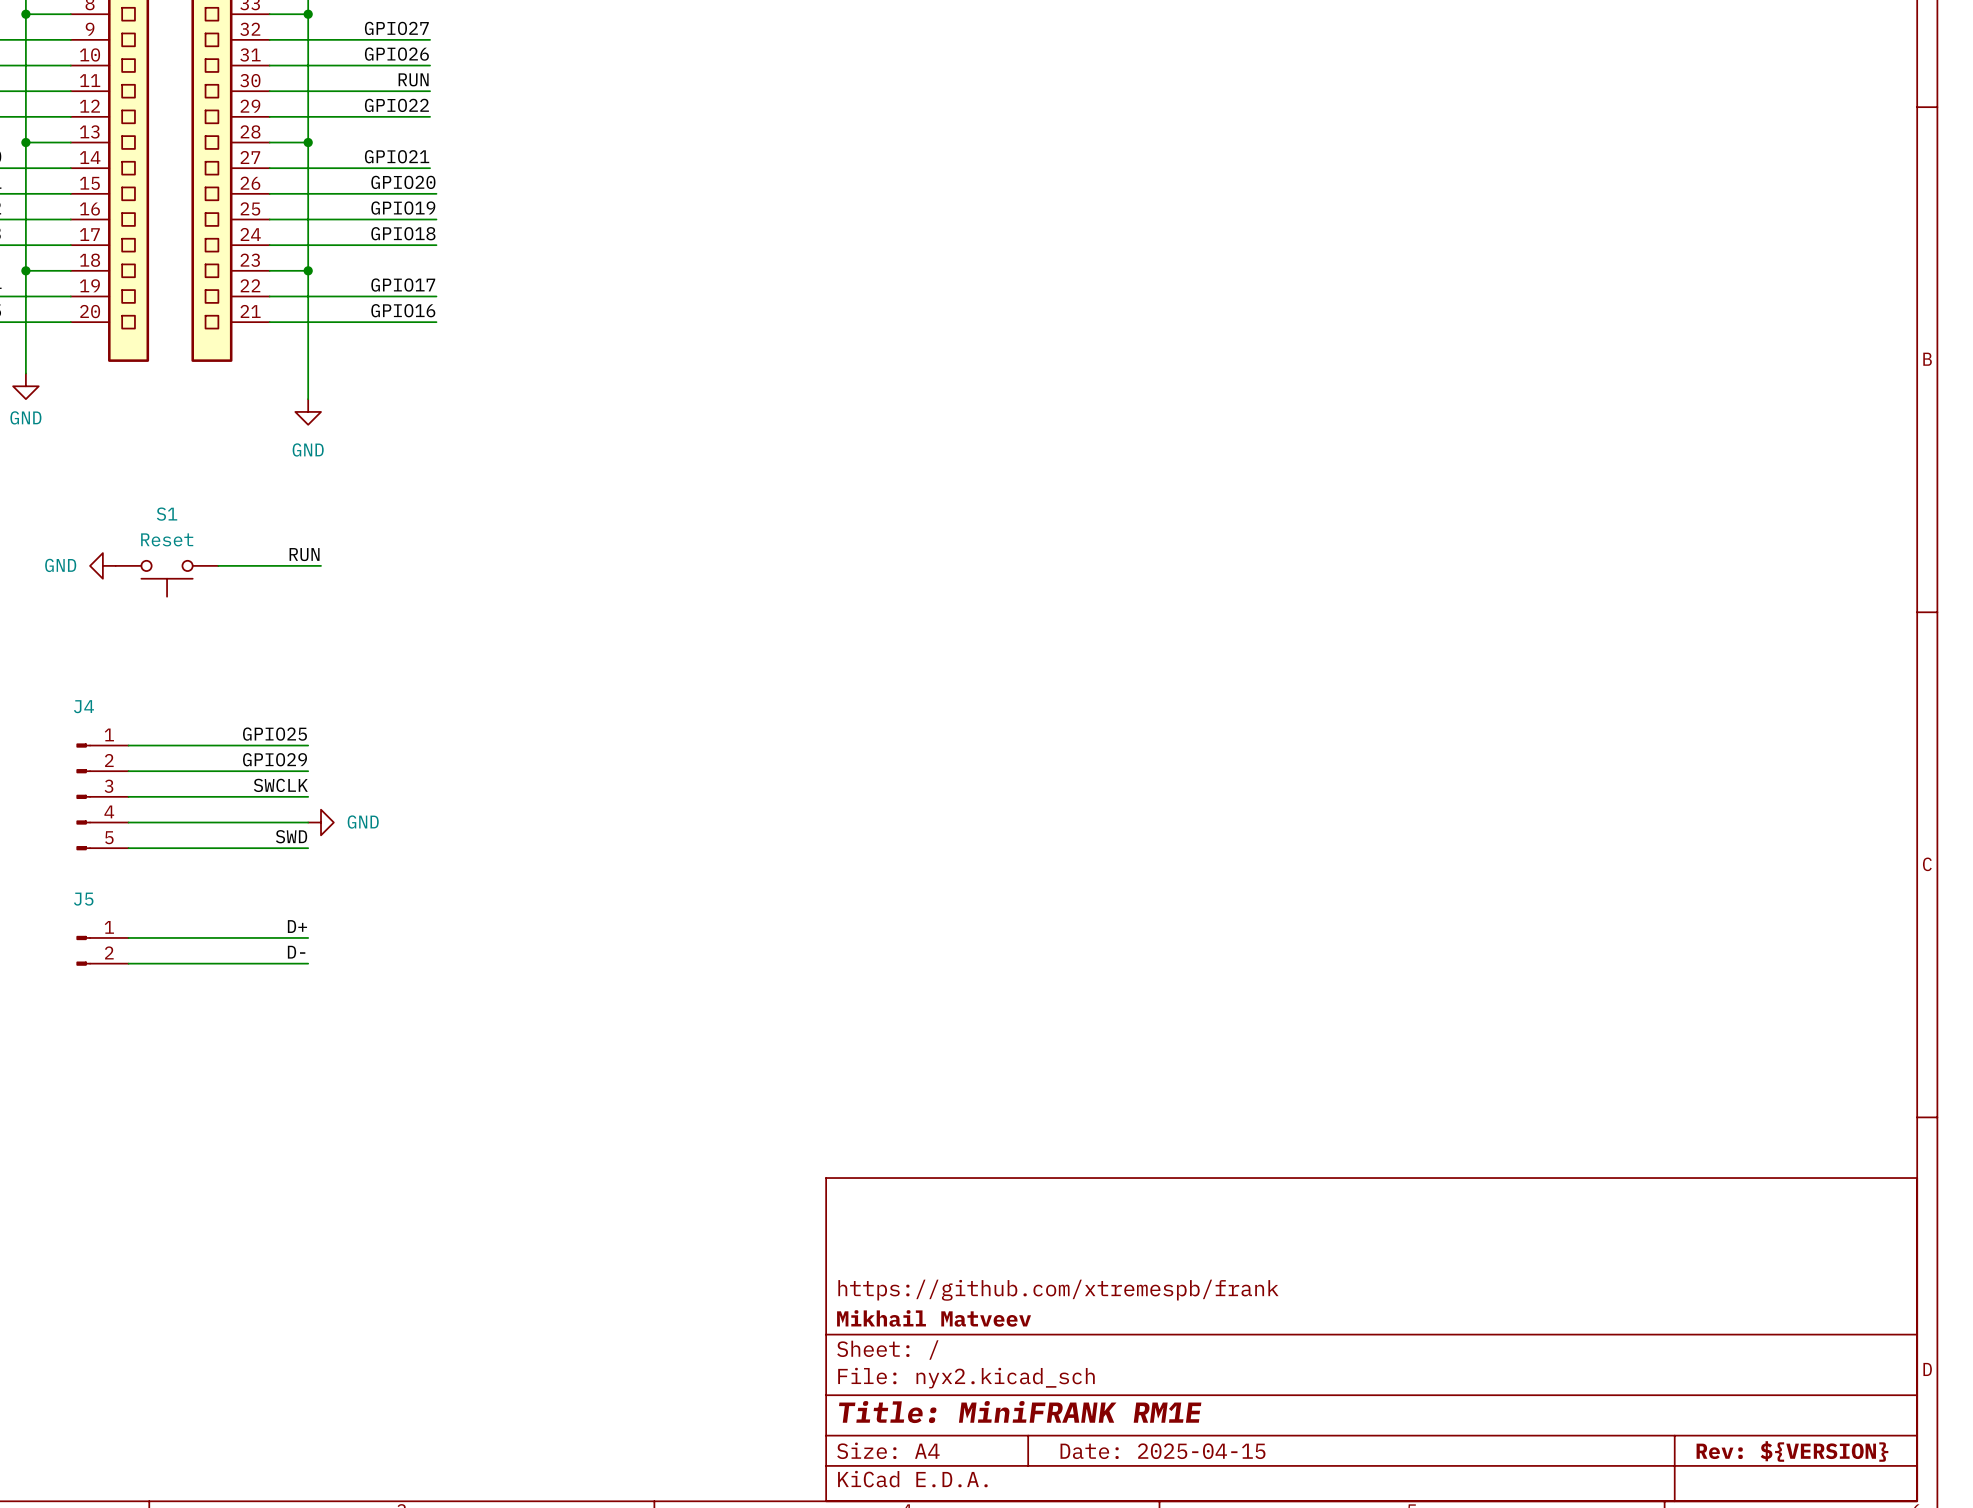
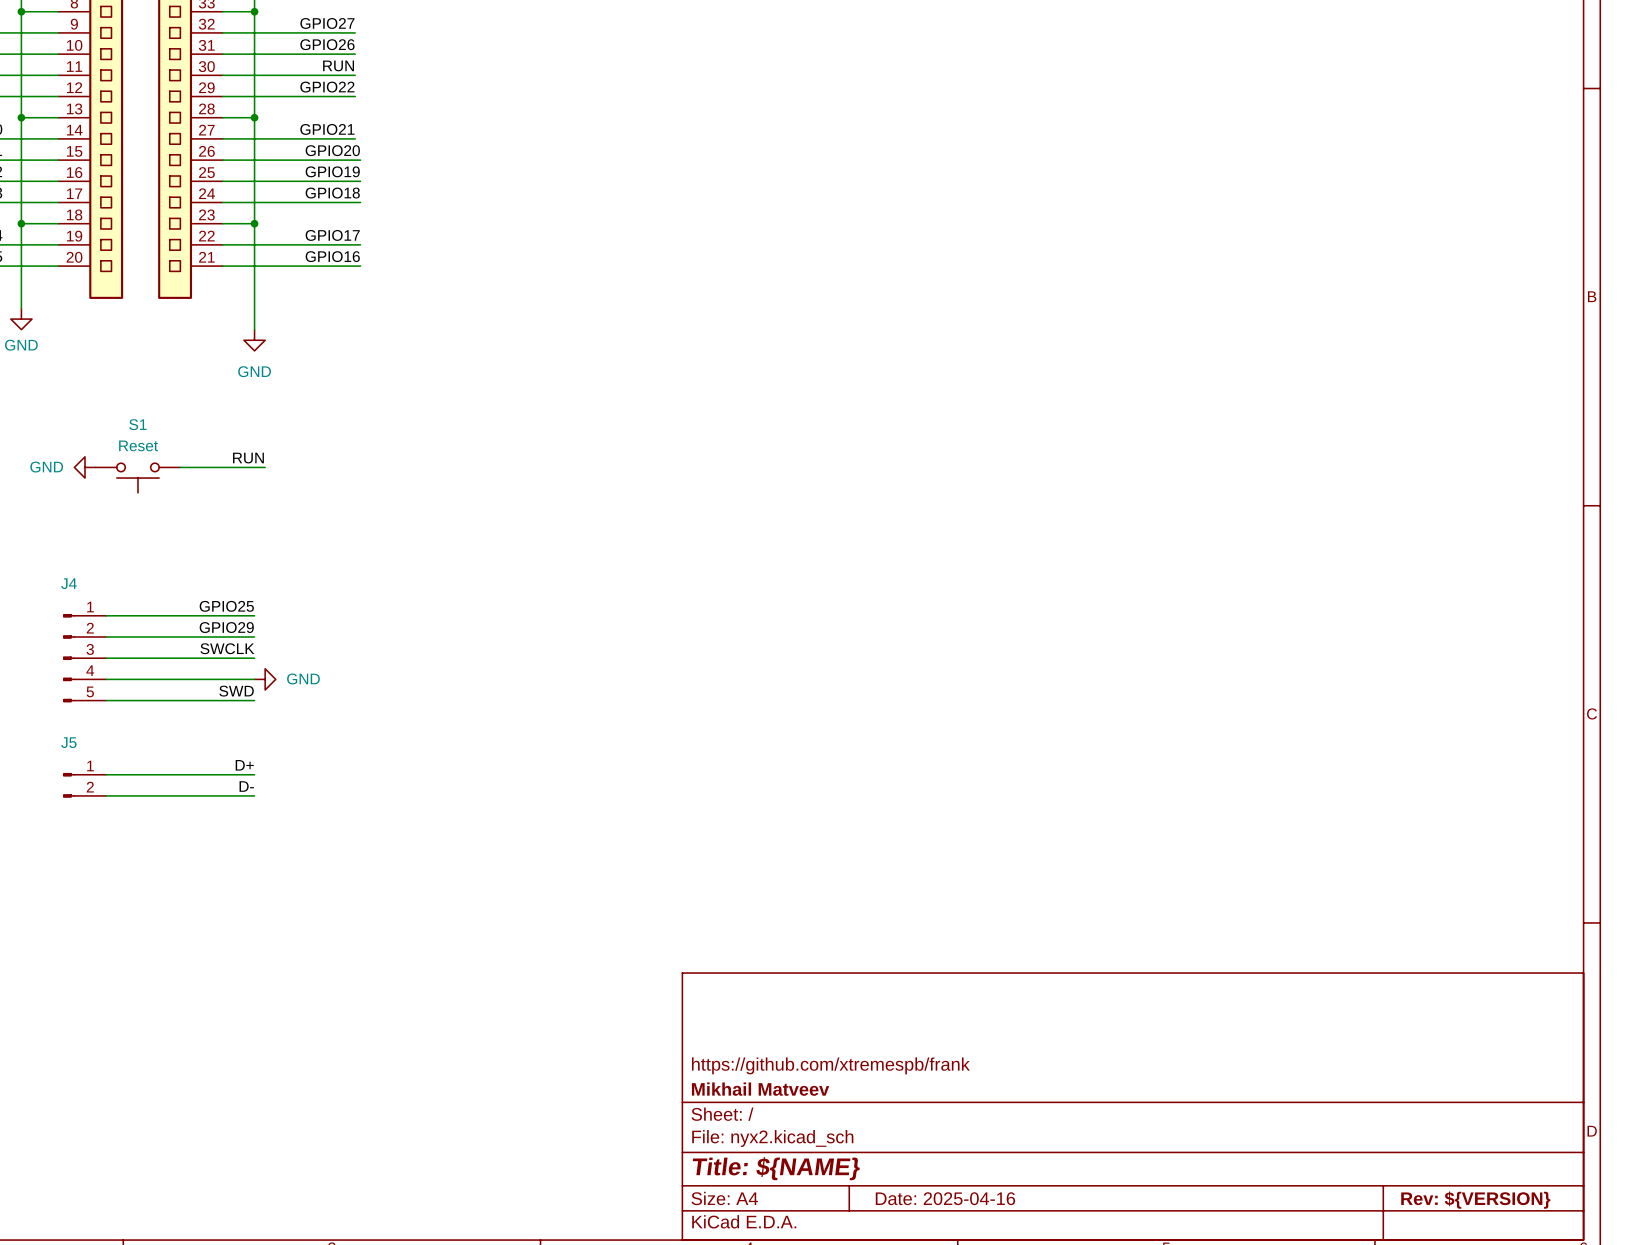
title block: Title: MiniFRANK RM1E (1020, 1412) -> Title: ${NAME} (776, 1168)
title block: Date: 2025-04-15 (1162, 1451) -> Date: 2025-04-16 (945, 1198)

